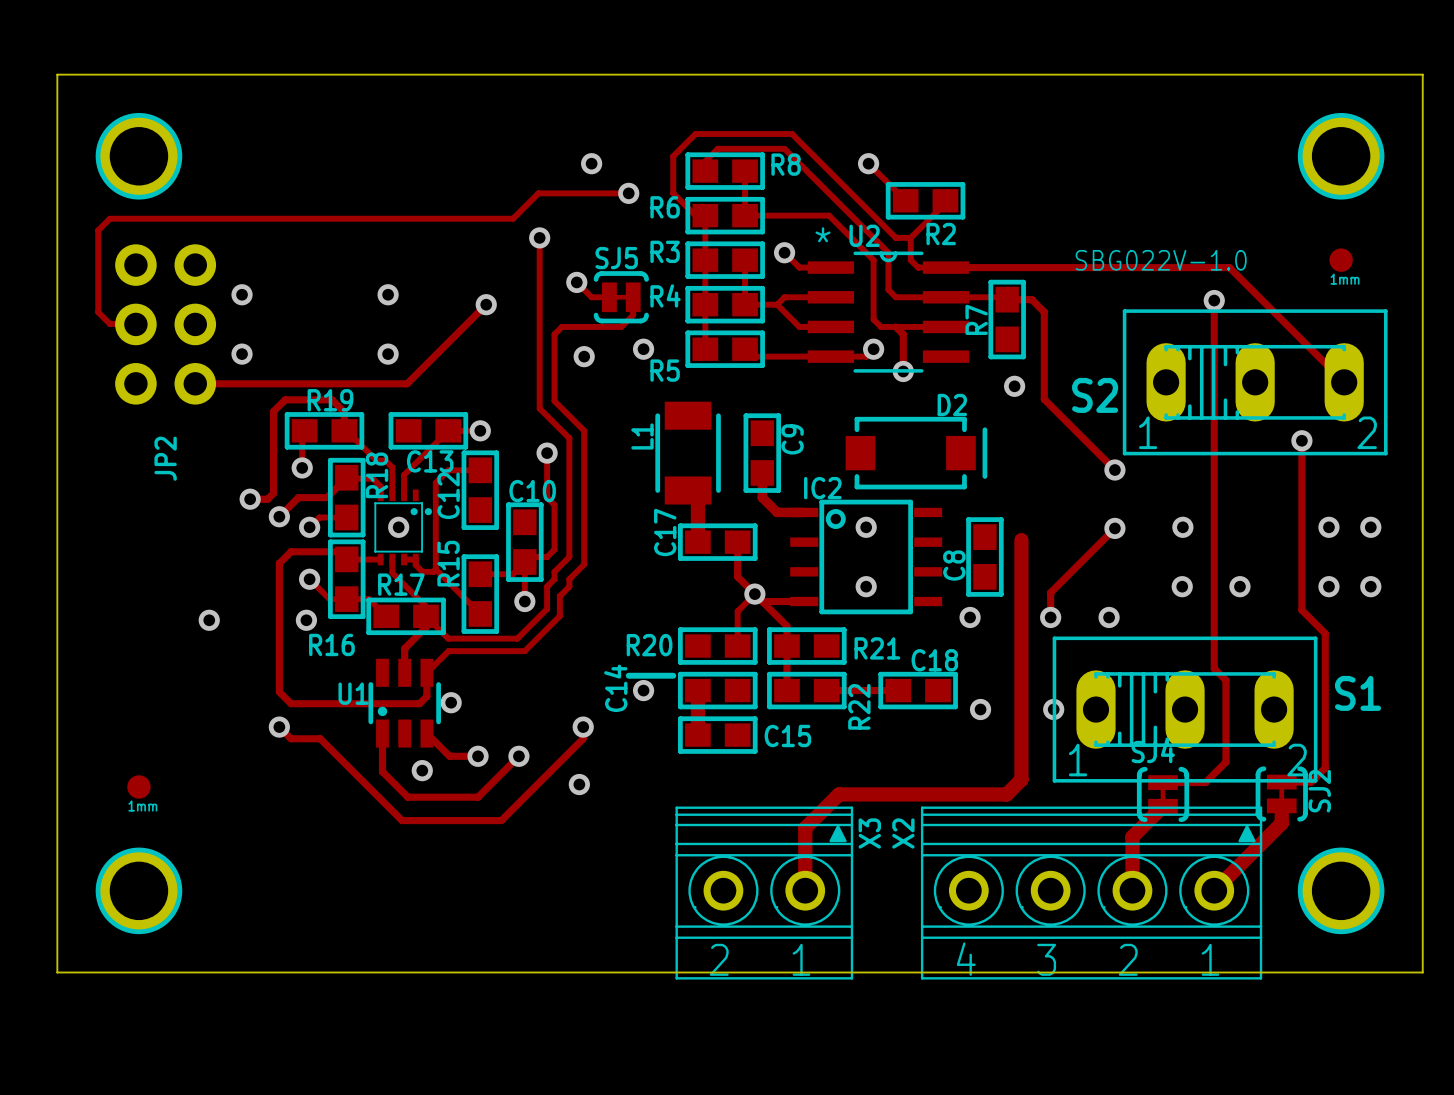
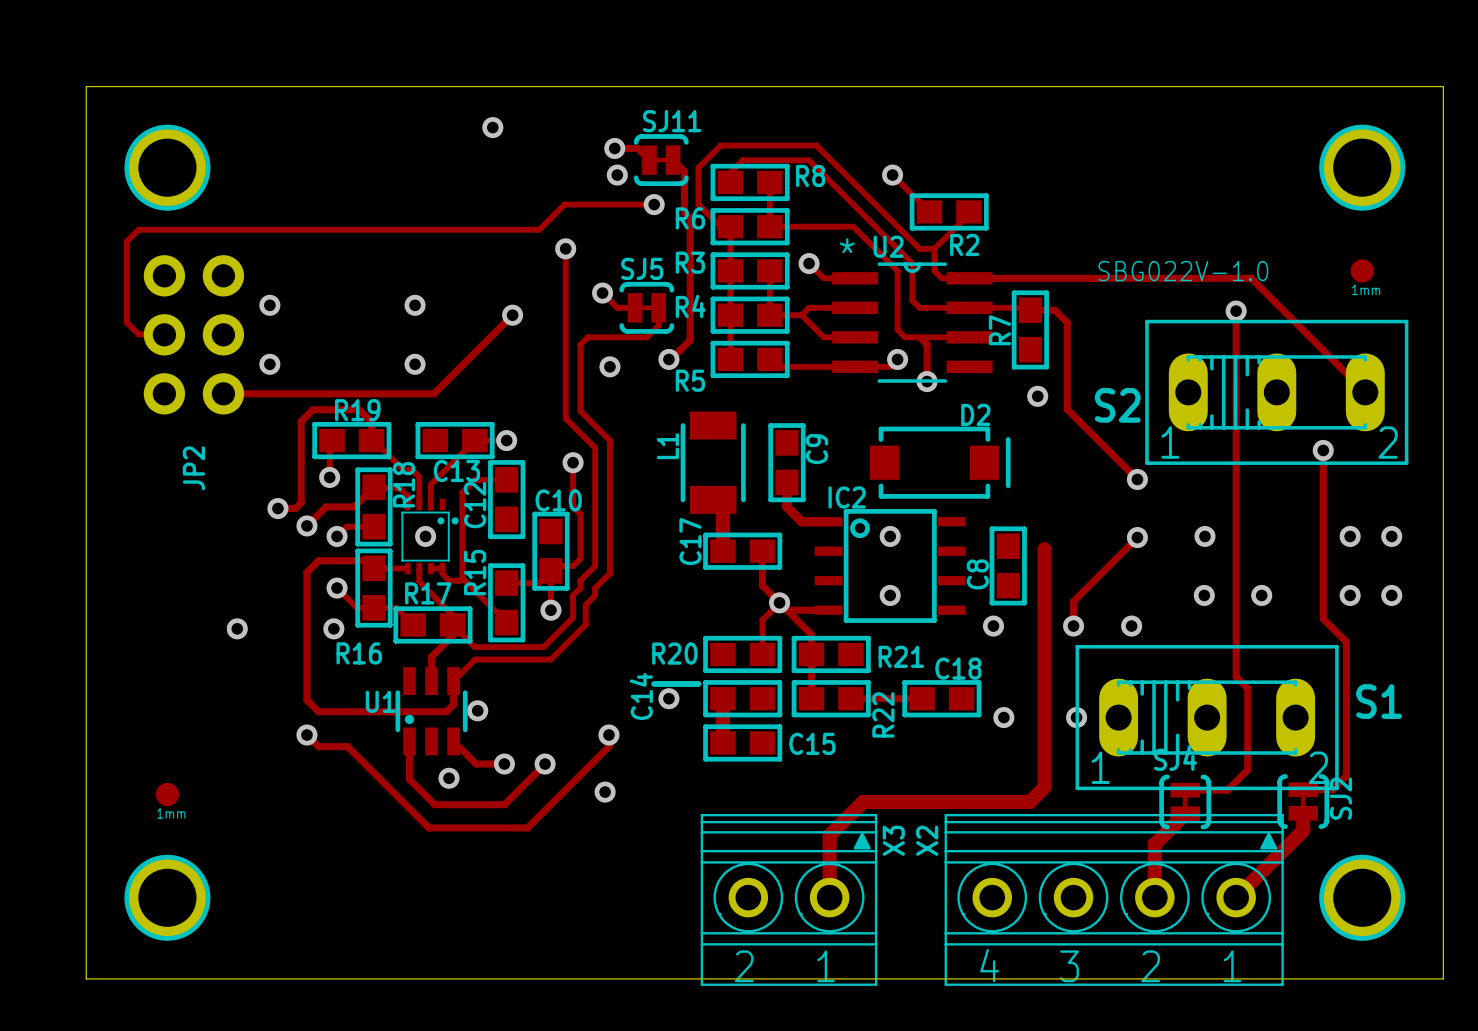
via: none -> (492, 127)
track: none -> (614, 148) (637, 148) (649, 160)
via: none -> (614, 148)
SJ11: none -> (661, 160)
track: none -> (673, 160) (684, 171) (684, 212) (690, 218) (690, 340) (672, 357)

